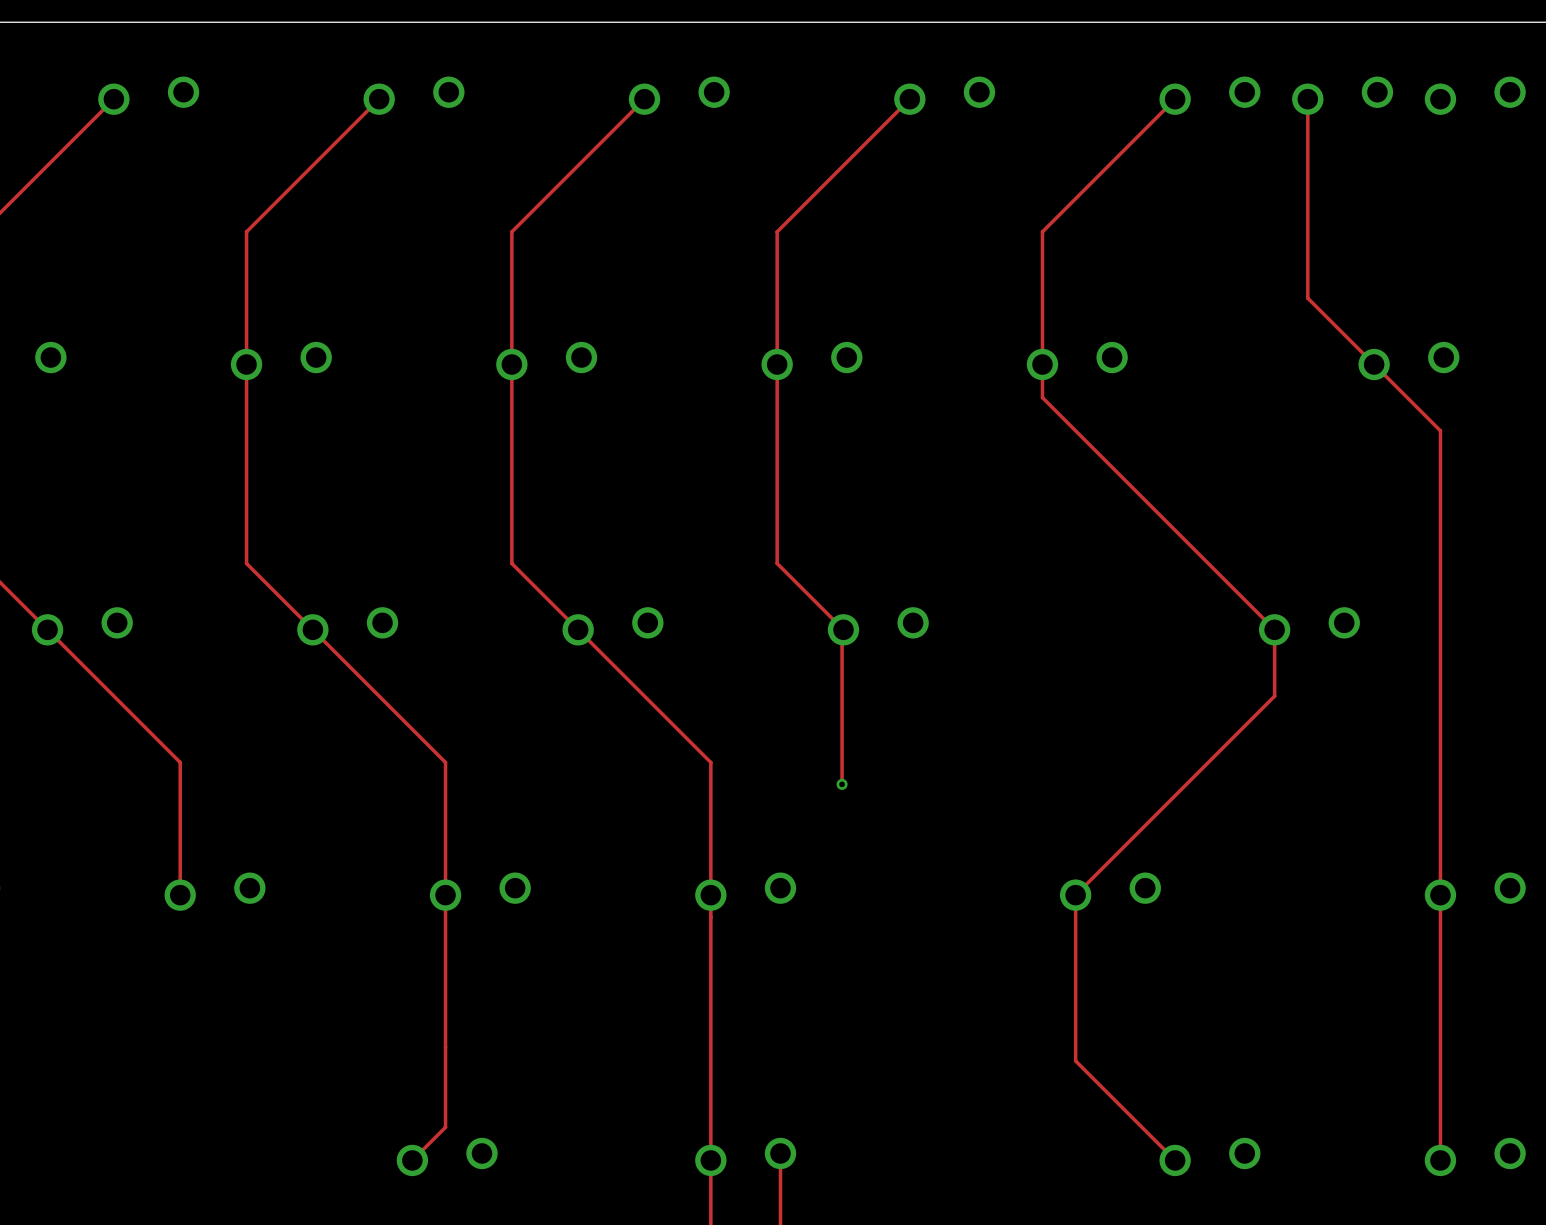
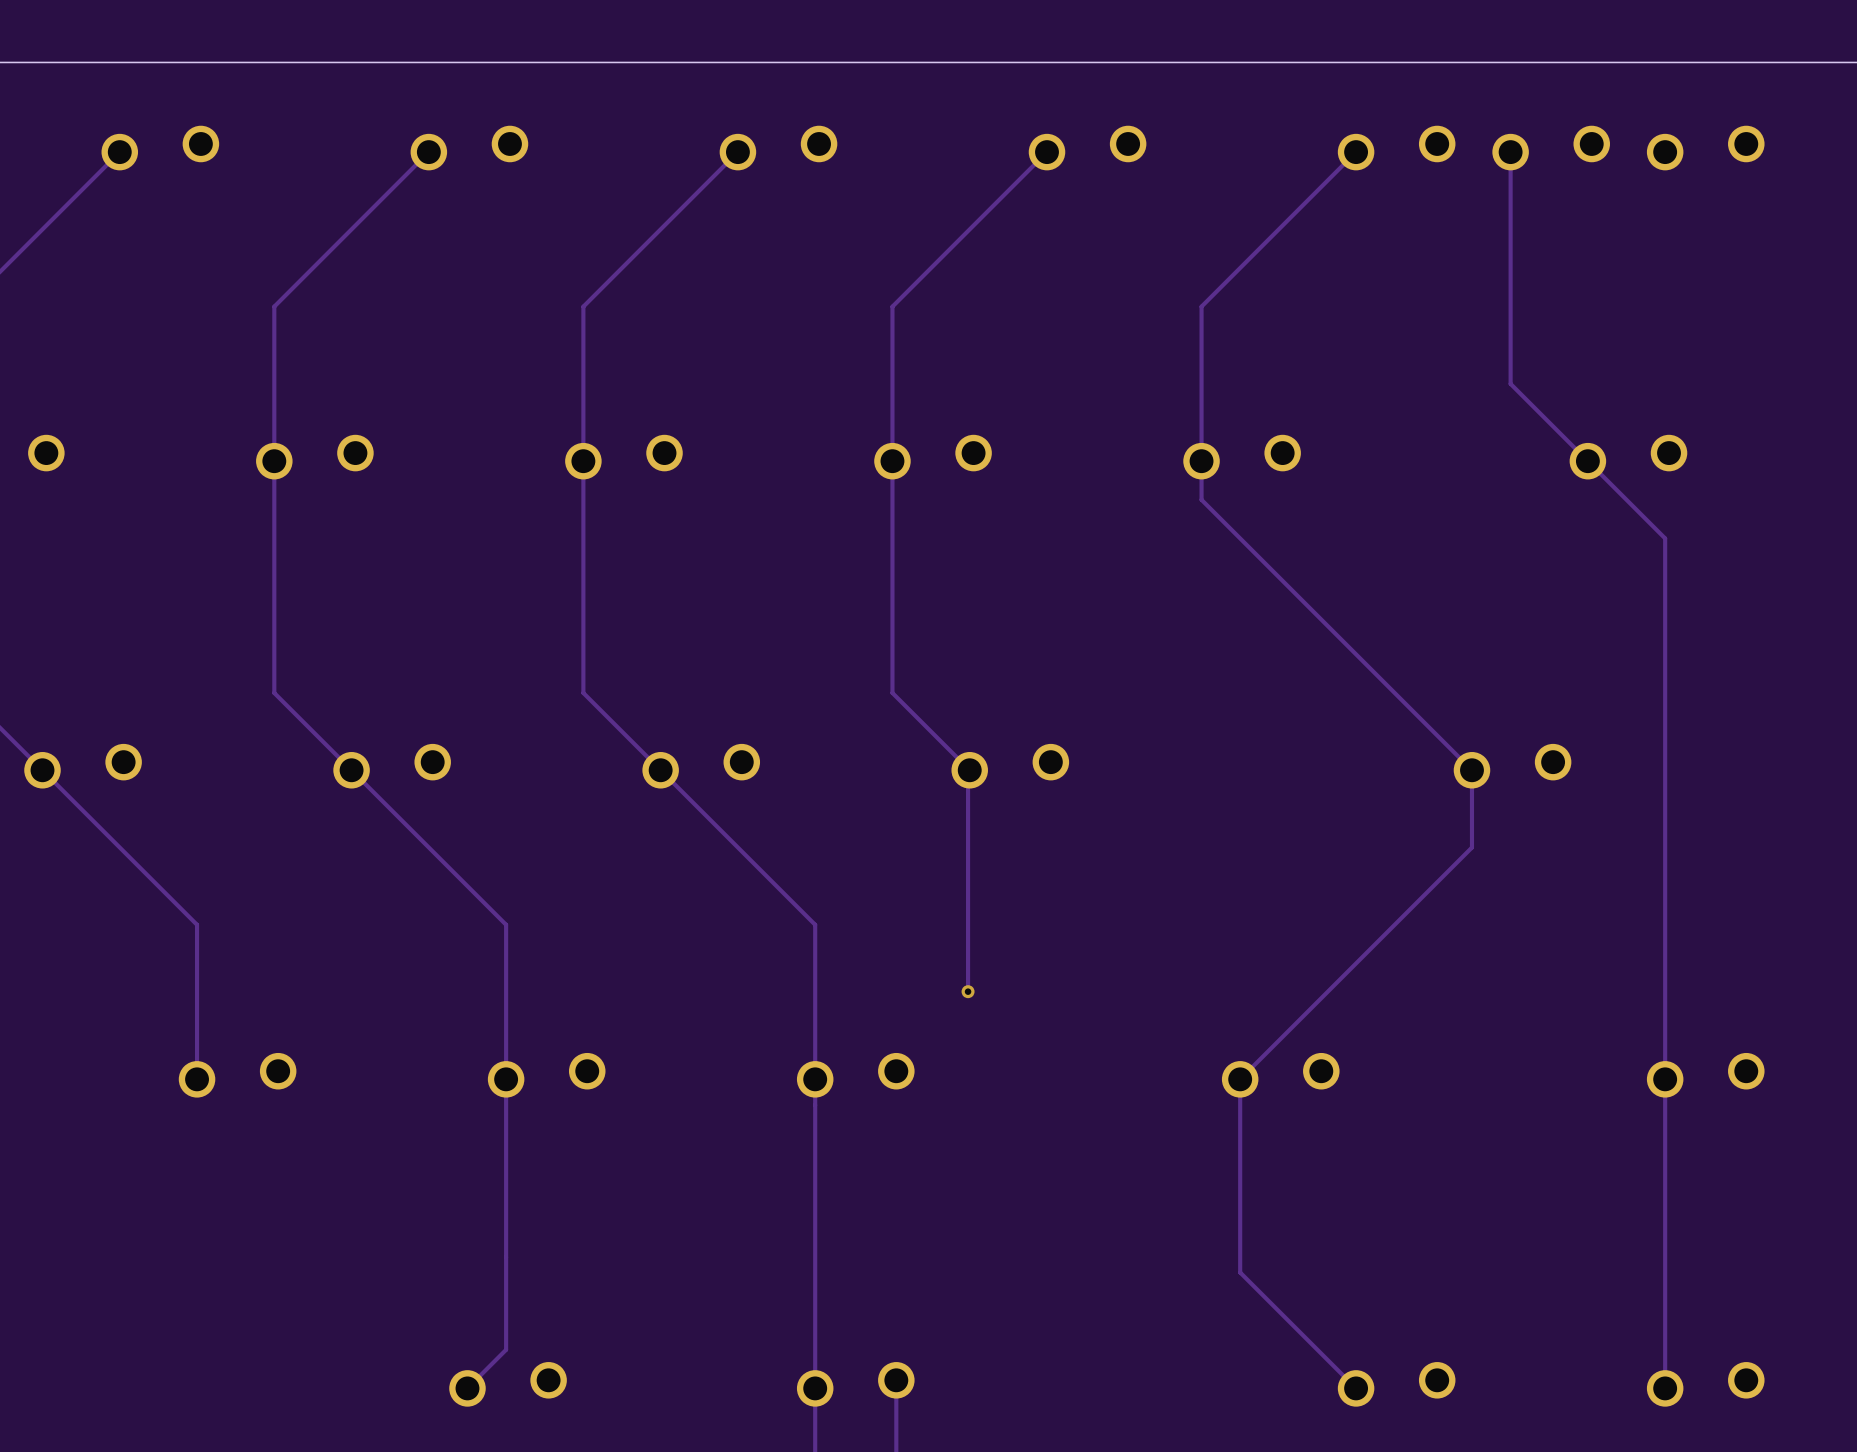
track: none -> (968, 950) (968, 991)
via position: (842, 784) -> (968, 991)

